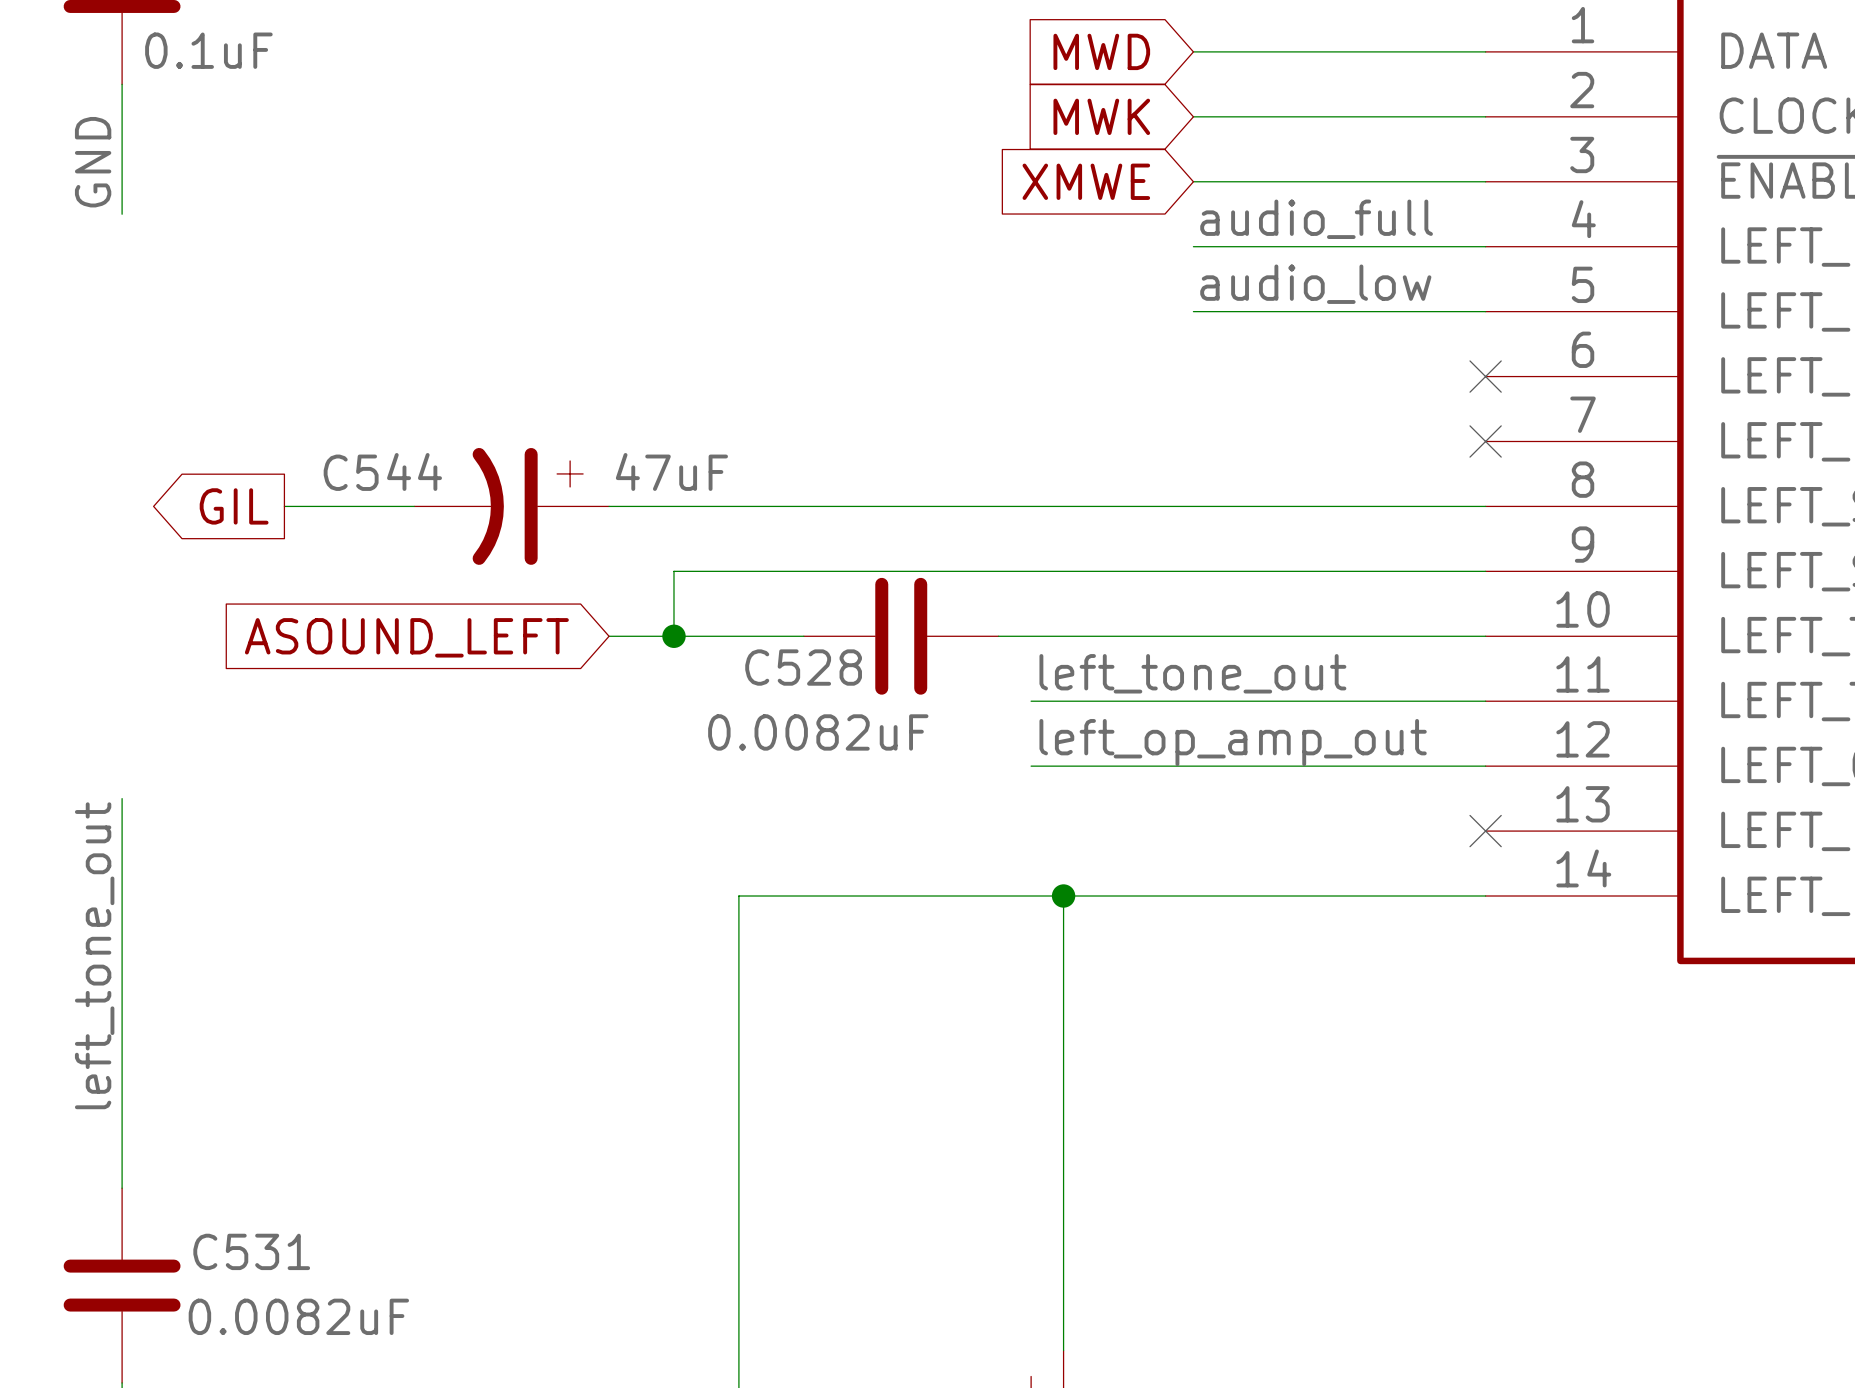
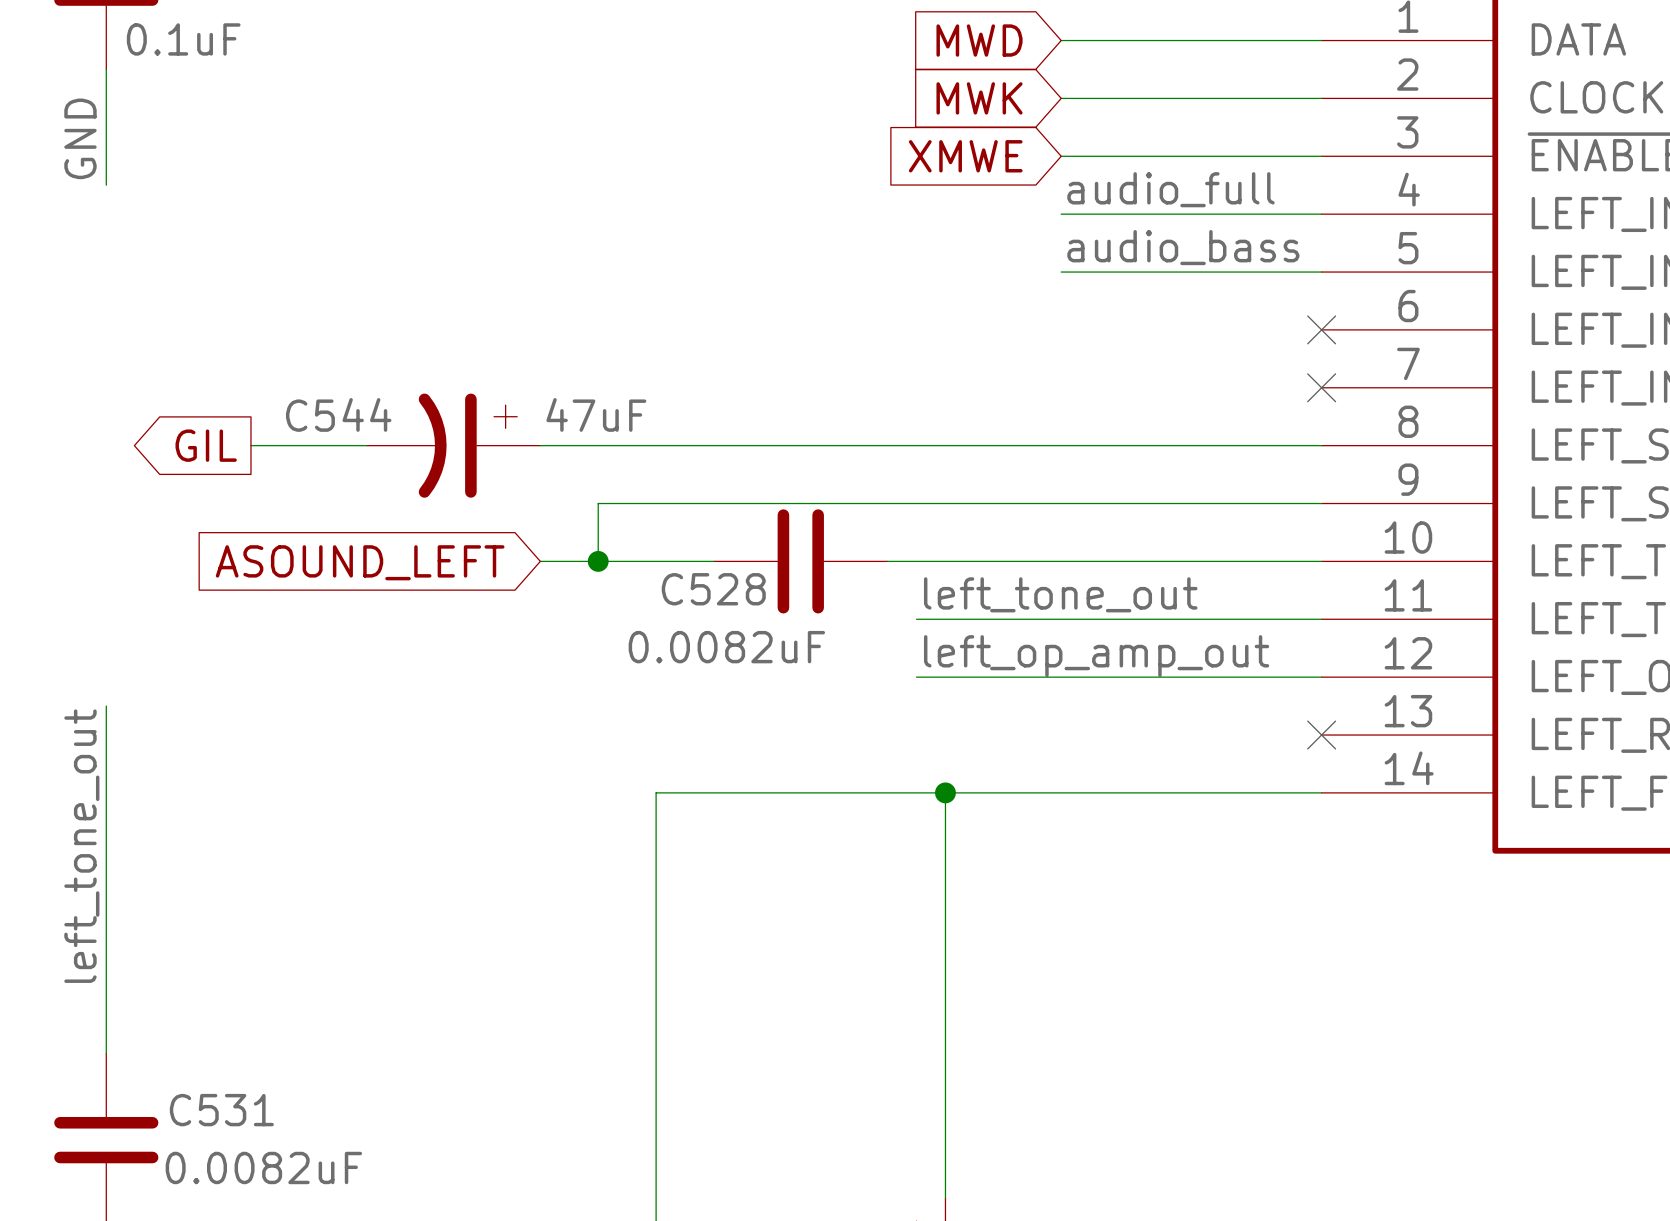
label: audio_low (1315, 284) -> audio_bass (1183, 247)

